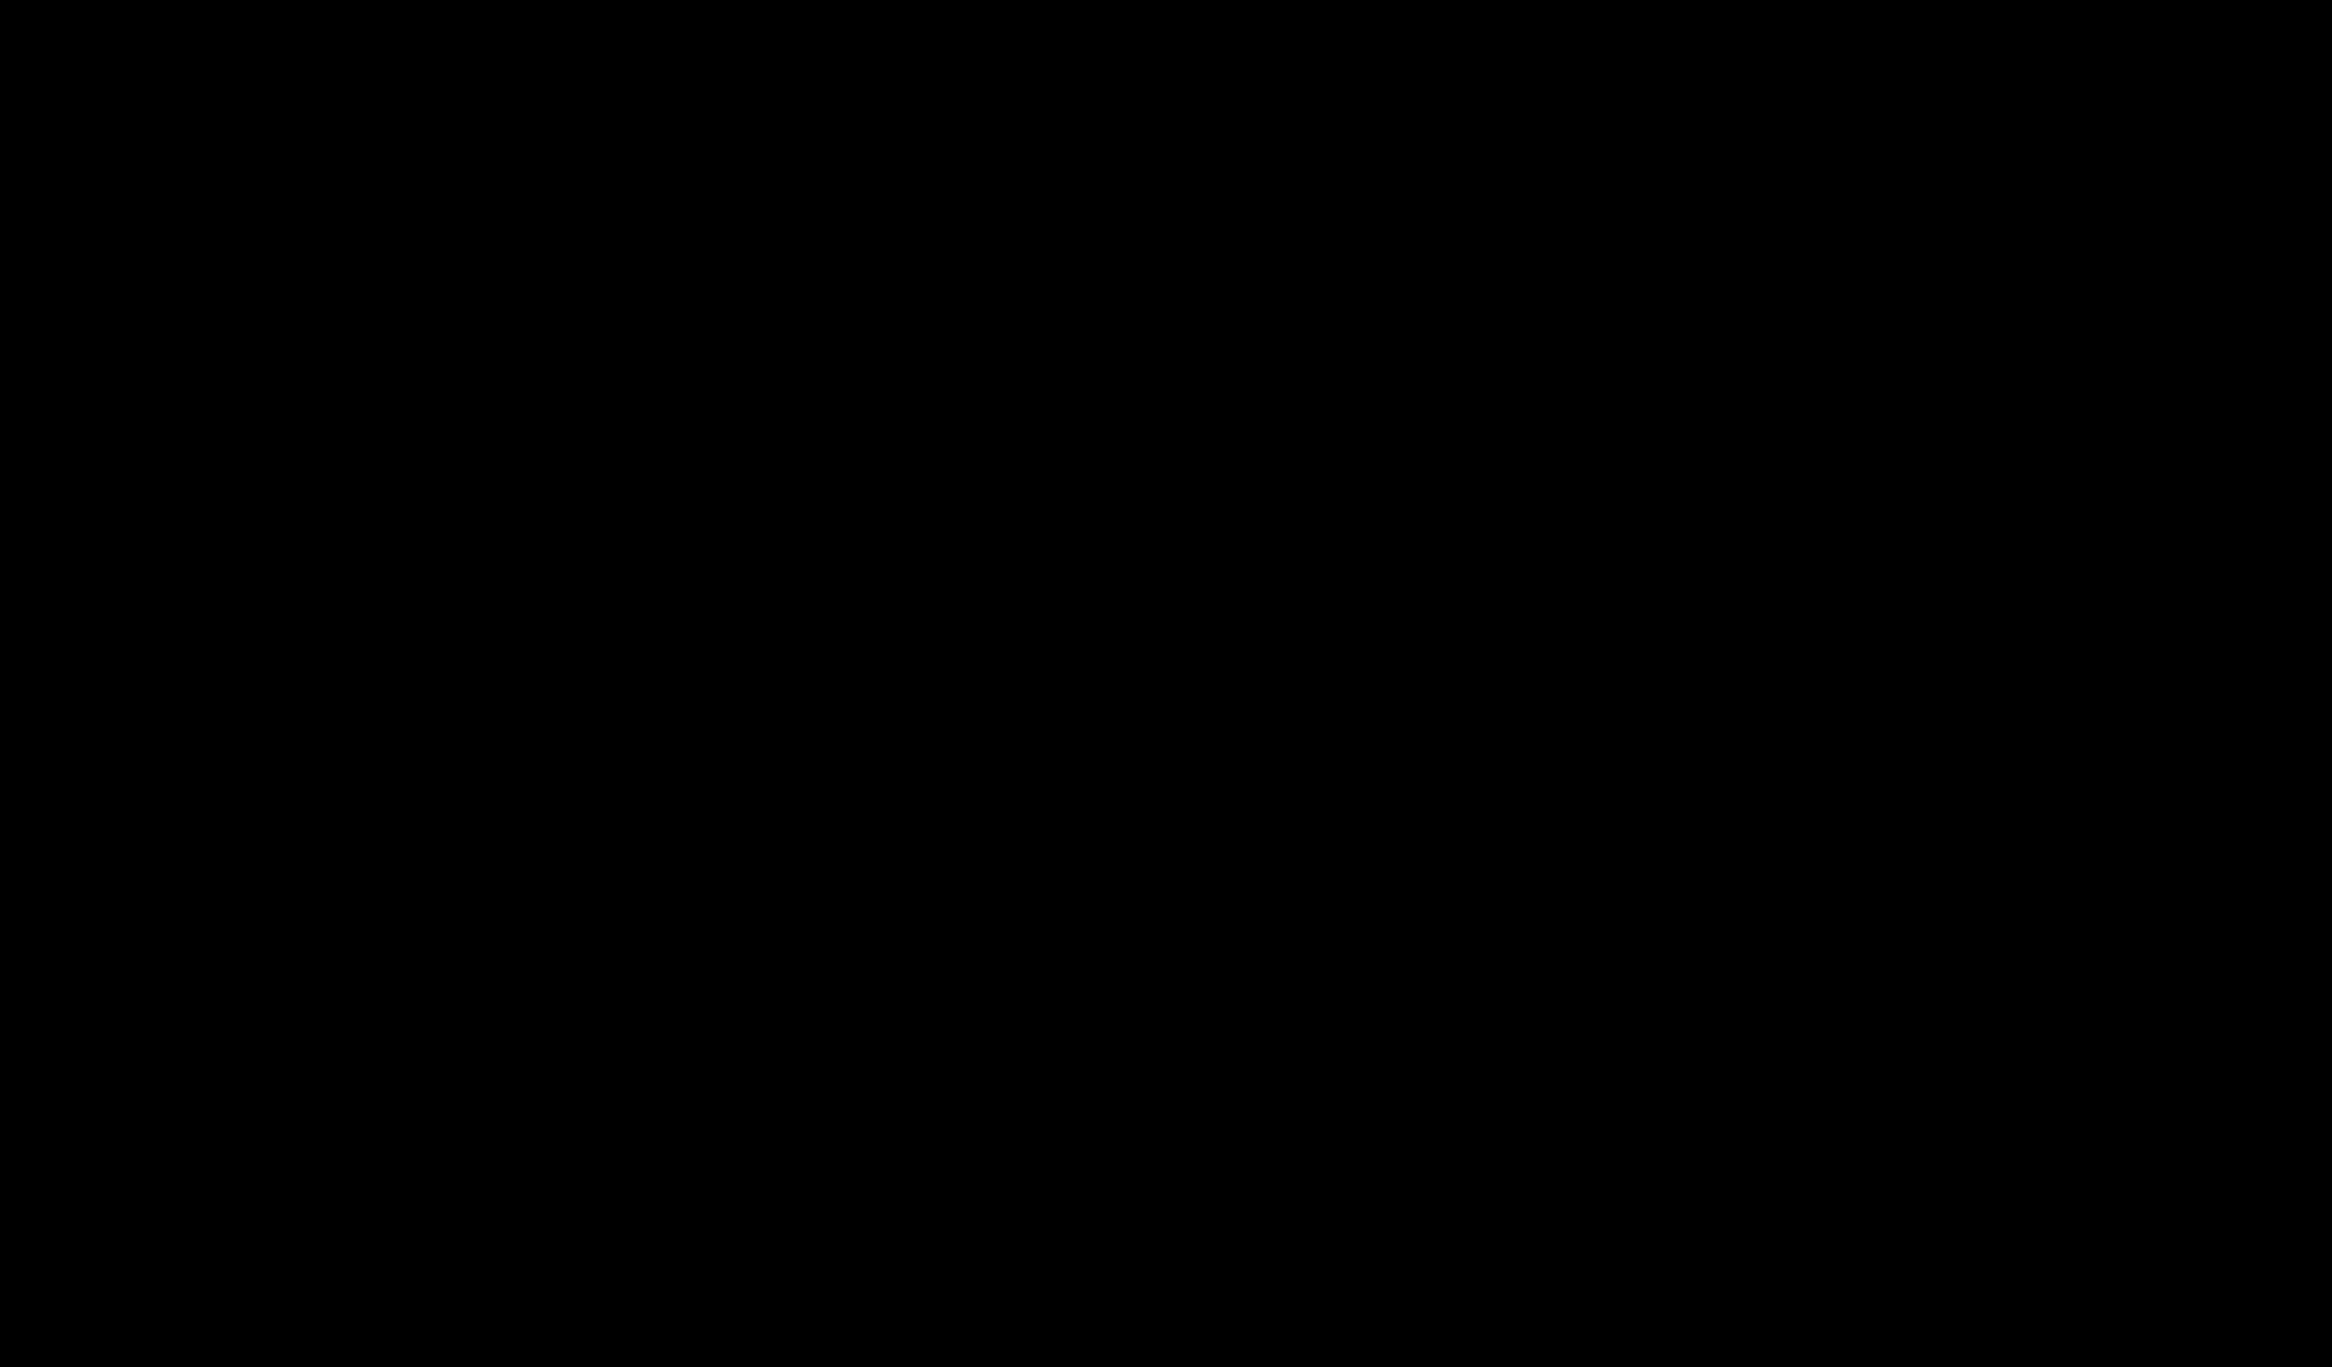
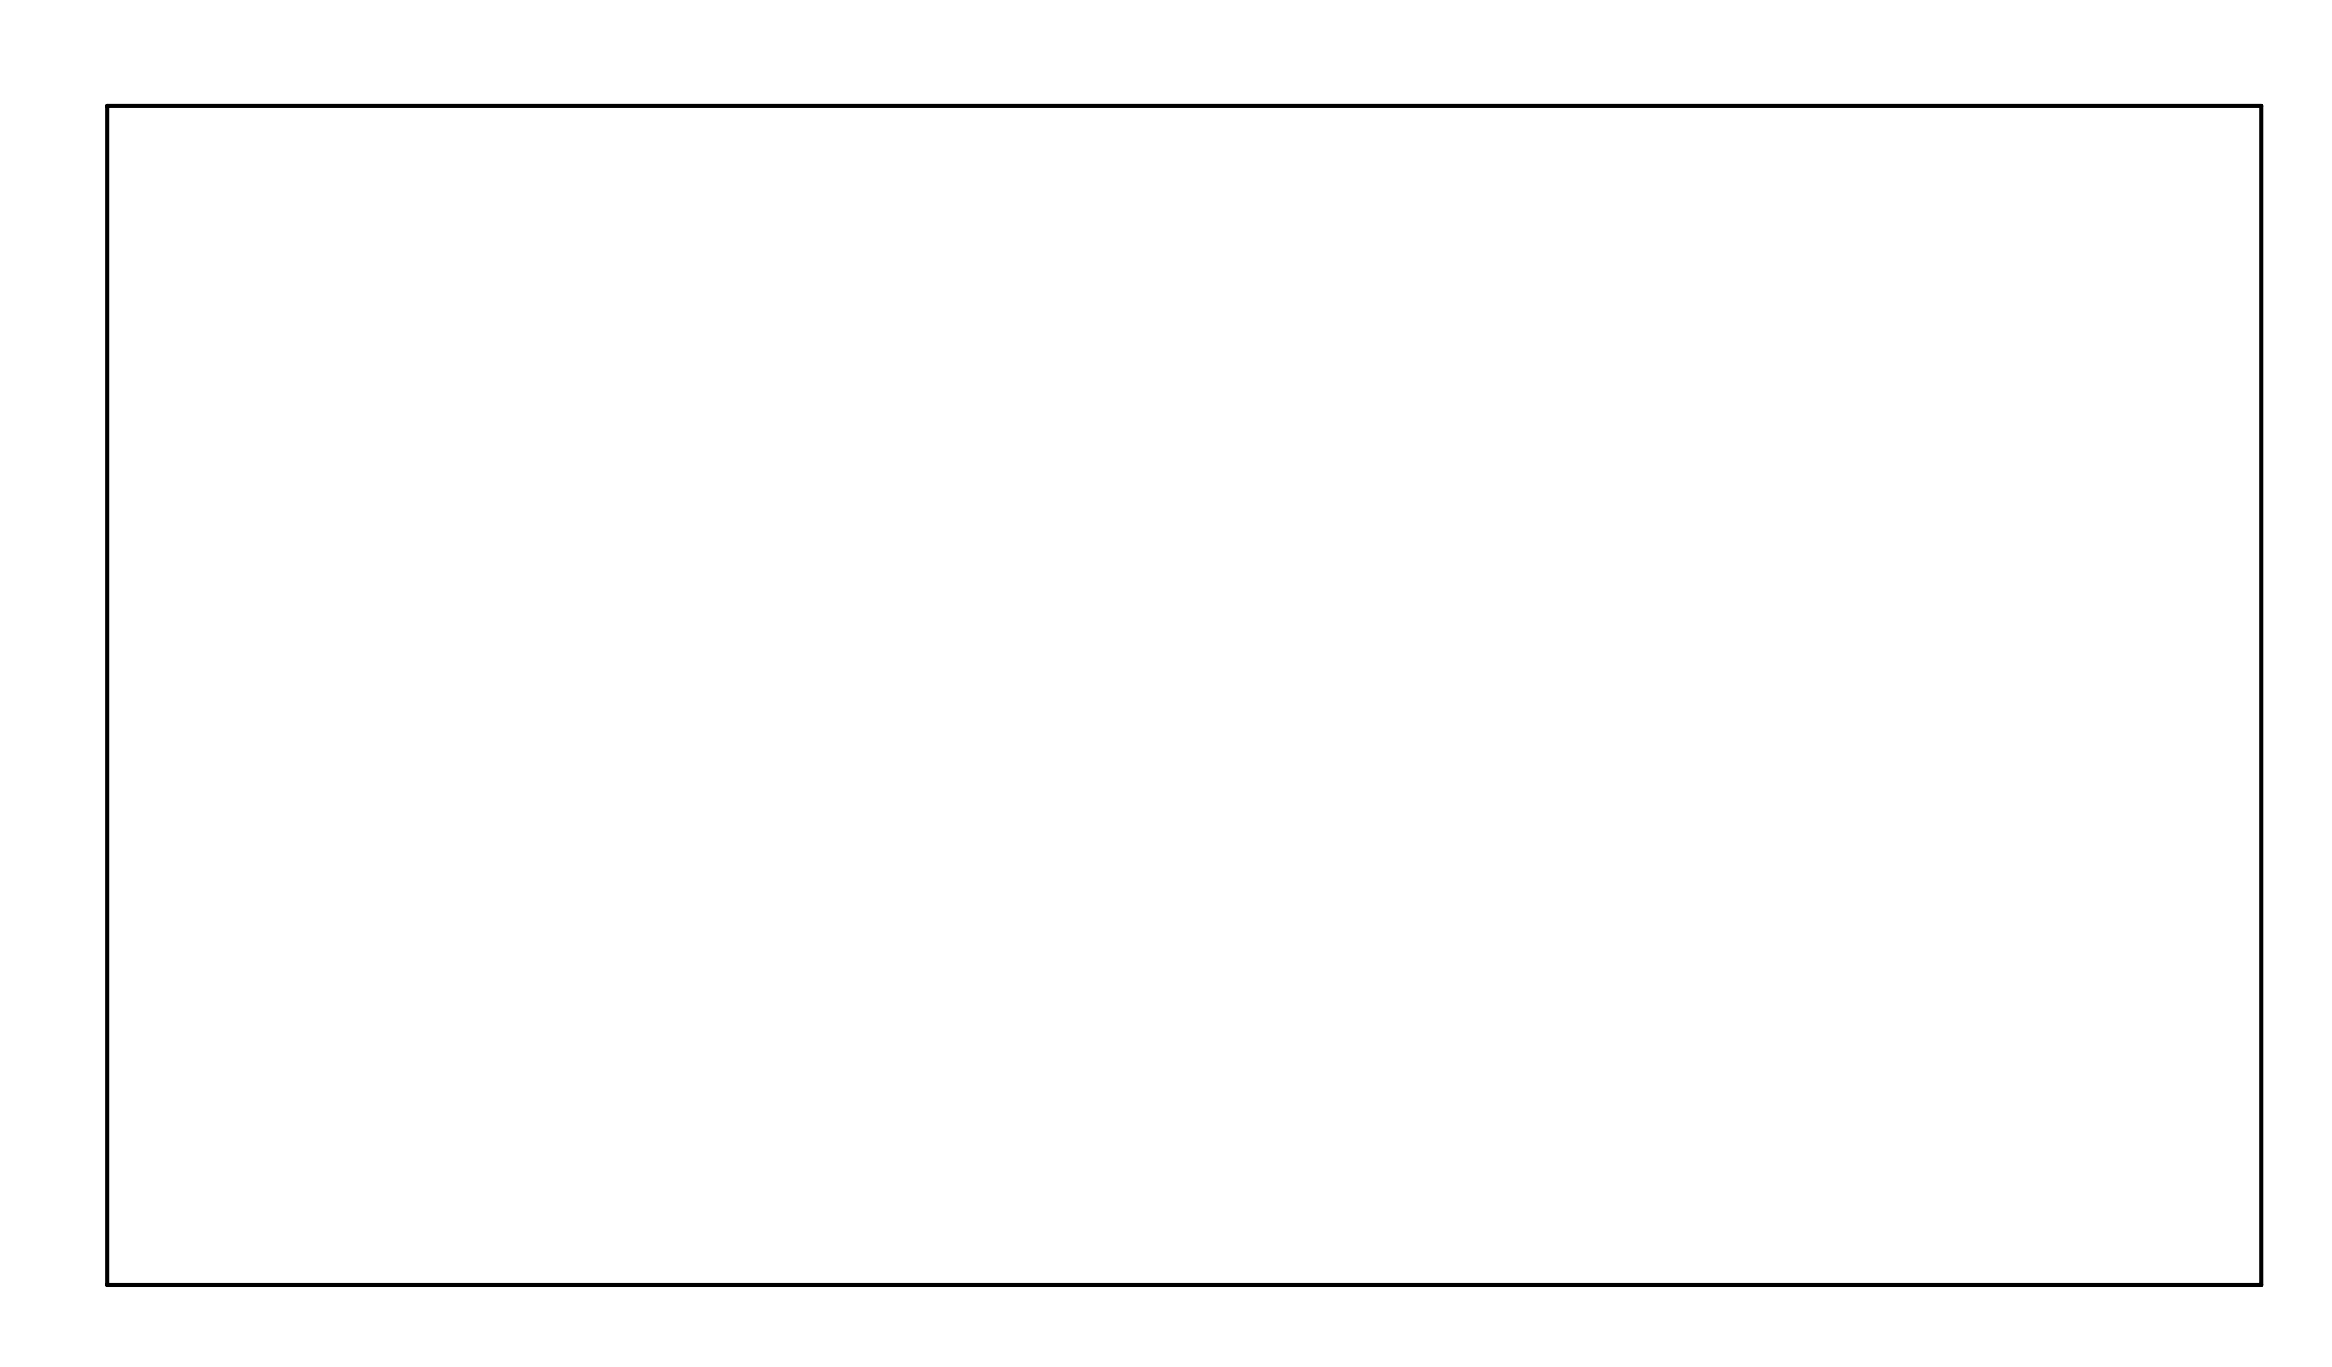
board edge: none -> (2261, 105) (107, 105) (107, 1284) (2261, 1284) (2261, 105)

